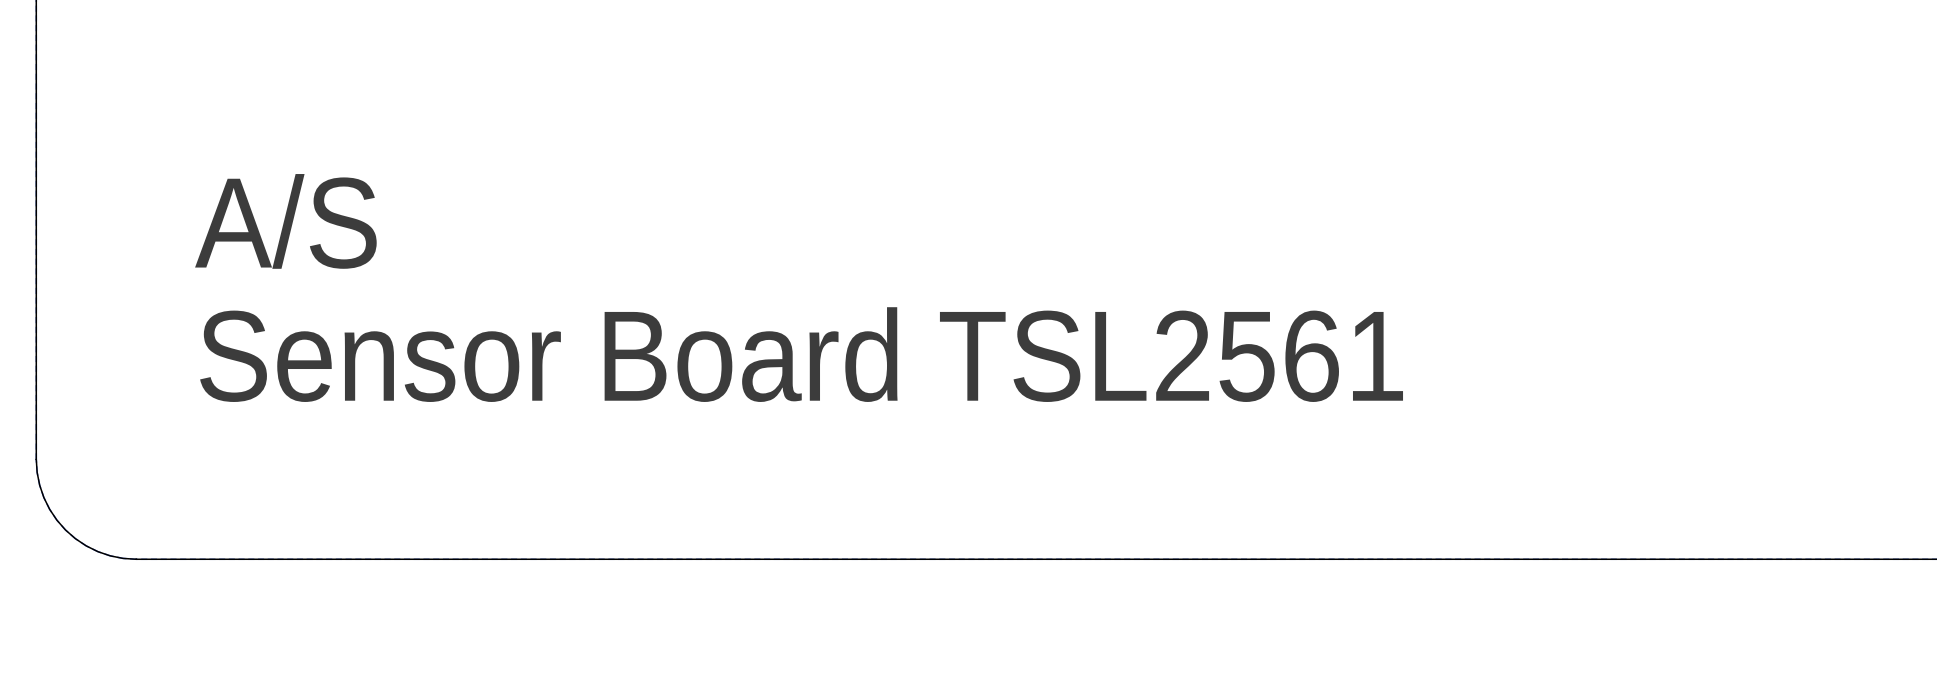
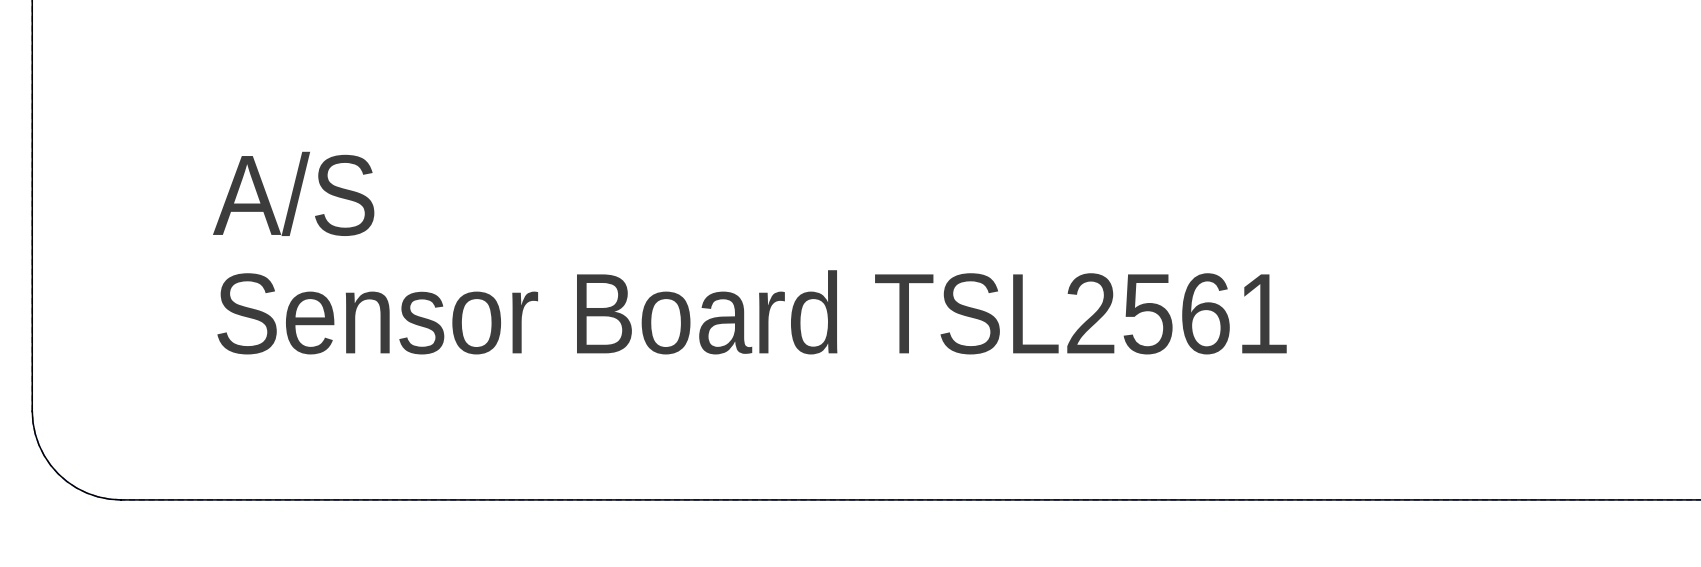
text position: A/S (285, 221) -> A/S (293, 193)
text position: Sensor Board TSL2561 (801, 354) -> Sensor Board TSL2561 (752, 312)

